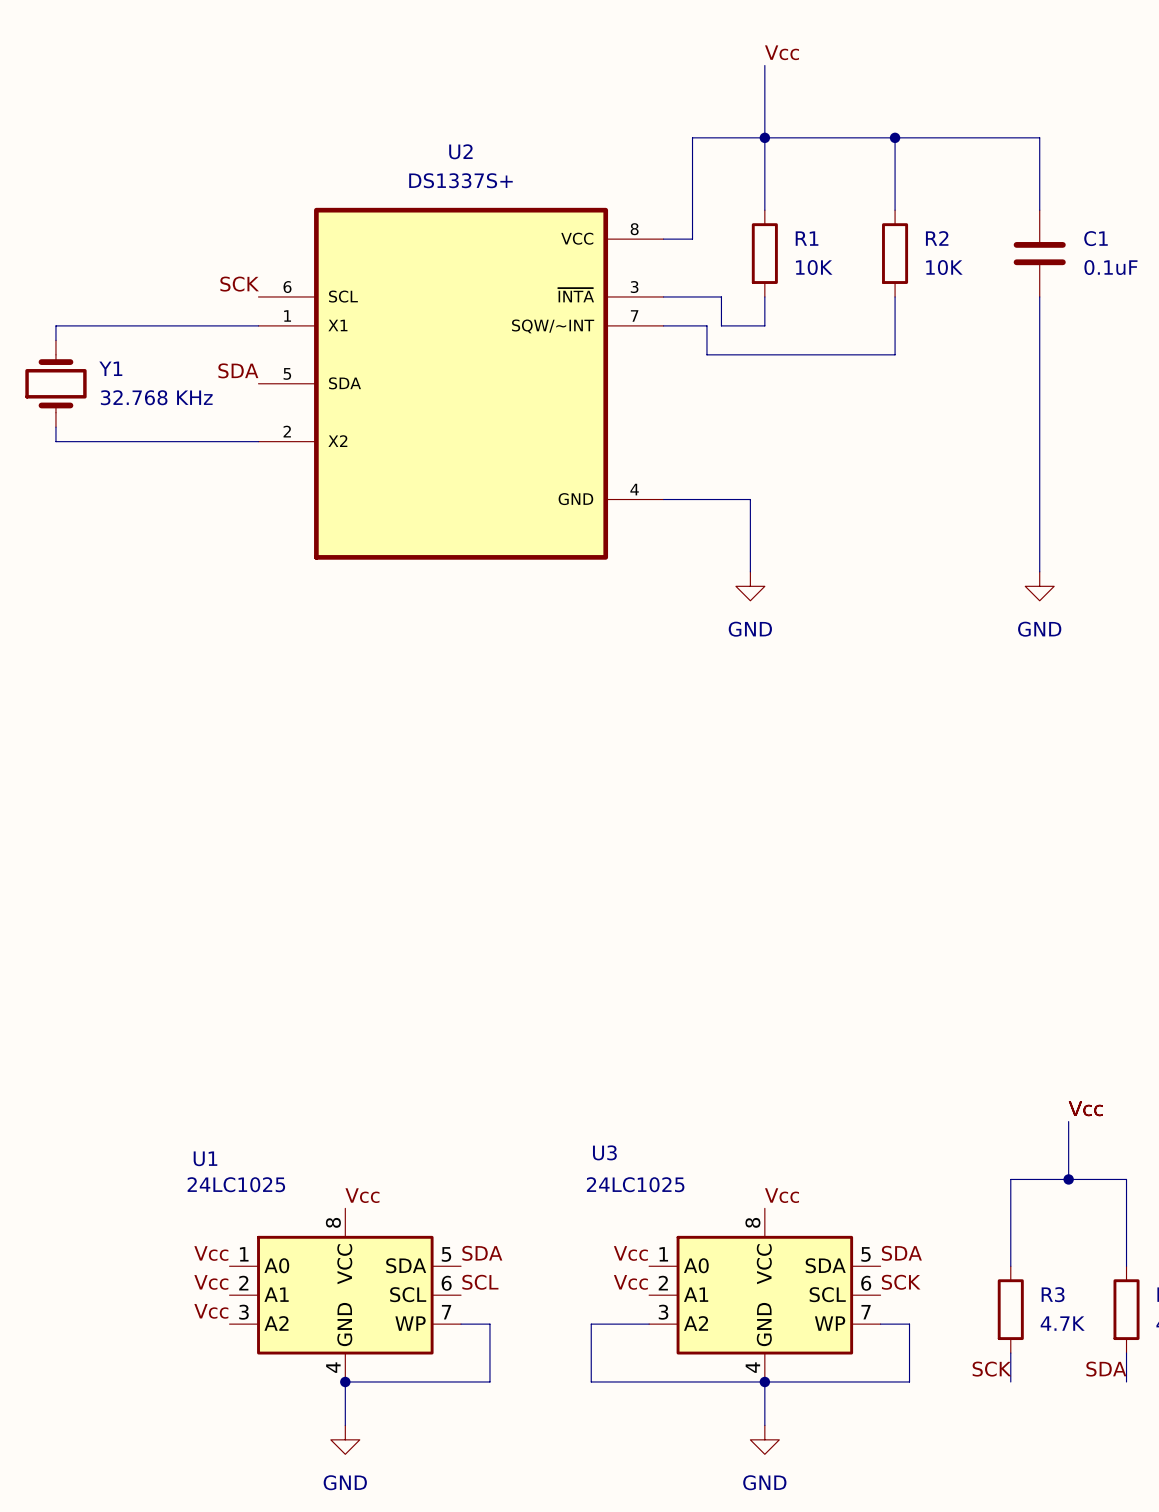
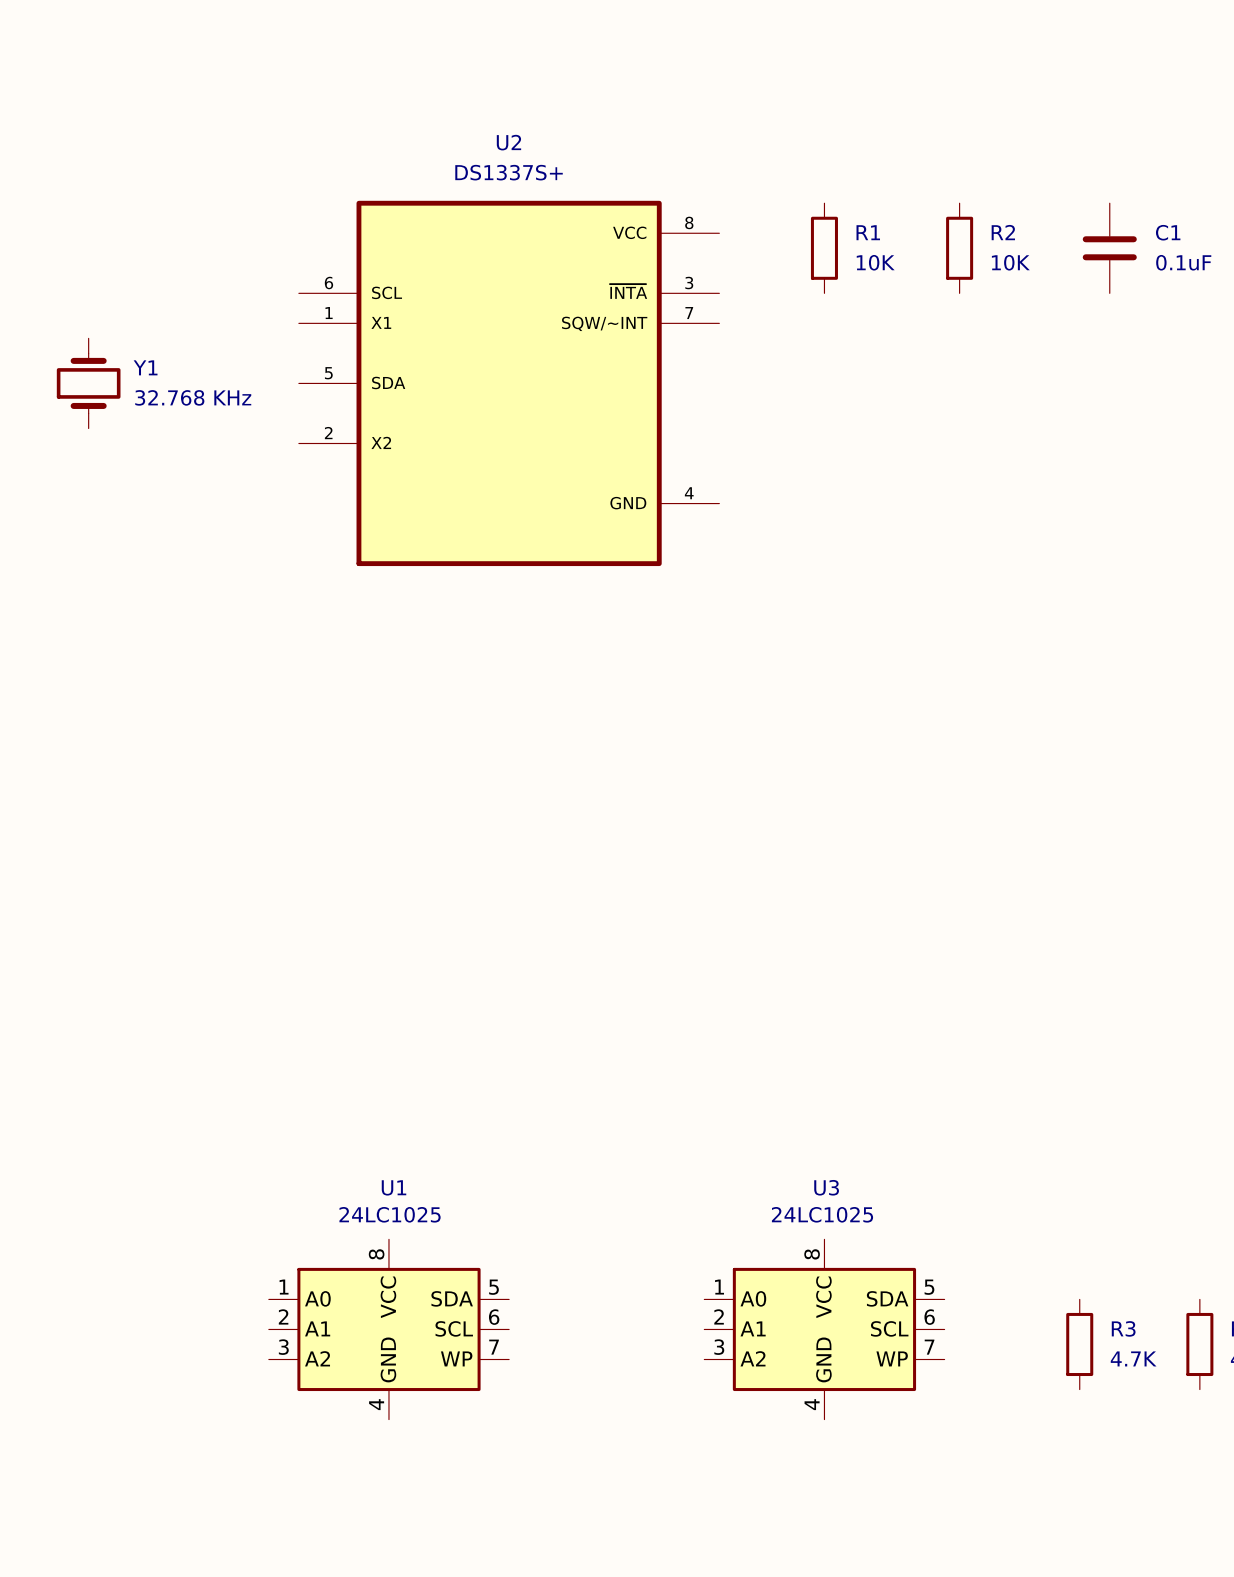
label: Vcc (782, 52) -> none
wire: (764, 65) (764, 210) -> none
junction: (764, 137) -> none
wire: (895, 137) (895, 210) -> none
junction: (895, 137) -> none
wire: (1039, 210) (1039, 137) (692, 137) (692, 239) (663, 239) -> none
label: SCK (239, 284) -> none
wire: (663, 296) (721, 296) (721, 325) (764, 325) (764, 296) -> none
wire: (895, 296) (895, 354) (706, 354) (706, 325) (663, 325) -> none
wire: (1039, 296) (1039, 571) -> none
wire: (258, 325) (55, 325) (55, 340) -> none
label: SDA (238, 370) -> none
wire: (55, 427) (55, 441) (258, 441) -> none
wire: (663, 499) (750, 499) (750, 571) -> none
power symbol: GND (750, 586) -> none
power symbol: GND (1039, 586) -> none
label: Vcc (1085, 1108) -> none
wire: (1068, 1121) (1068, 1179) -> none
U3 name position: U3 (604, 1152) -> U3 (826, 1187)
U1 name position: U1 (205, 1158) -> U1 (394, 1187)
junction: (1068, 1179) -> none
U1 value position: 24LC1025 (236, 1184) -> 24LC1025 (390, 1214)
U3 value position: 24LC1025 (635, 1184) -> 24LC1025 (822, 1214)
label: Vcc (362, 1195) -> none
label: Vcc (782, 1195) -> none
label: Vcc (211, 1253) -> none
label: SDA (482, 1253) -> none
label: Vcc (630, 1253) -> none
label: SDA (901, 1253) -> none
wire: (1010, 1266) (1010, 1179) (1126, 1179) (1126, 1266) -> none
label: Vcc (211, 1282) -> none
label: SCL (480, 1282) -> none
label: Vcc (630, 1282) -> none
label: SCK (901, 1282) -> none
label: Vcc (211, 1311) -> none
wire: (461, 1324) (489, 1324) (489, 1381) (345, 1381) (345, 1425) -> none
wire: (649, 1324) (591, 1324) (591, 1381) (909, 1381) (909, 1324) (880, 1324) -> none
wire: (1010, 1353) (1010, 1381) -> none
wire: (1126, 1353) (1126, 1381) -> none
label: SCK (991, 1369) -> none
label: SDA (1106, 1369) -> none
junction: (345, 1381) -> none
wire: (764, 1381) (764, 1425) -> none
junction: (764, 1381) -> none
power symbol: GND (345, 1439) -> none
power symbol: GND (764, 1439) -> none

